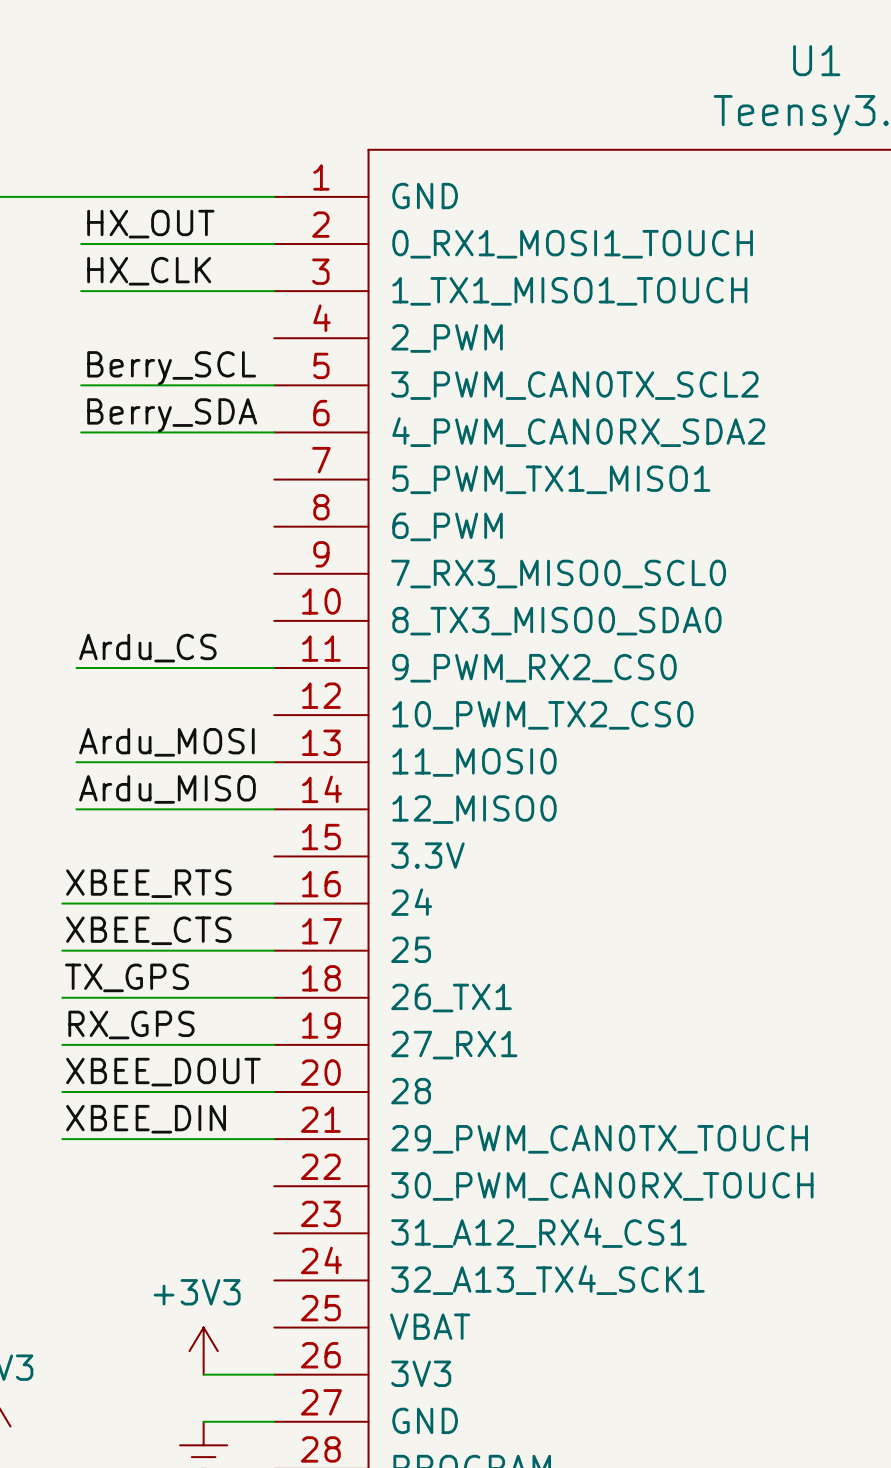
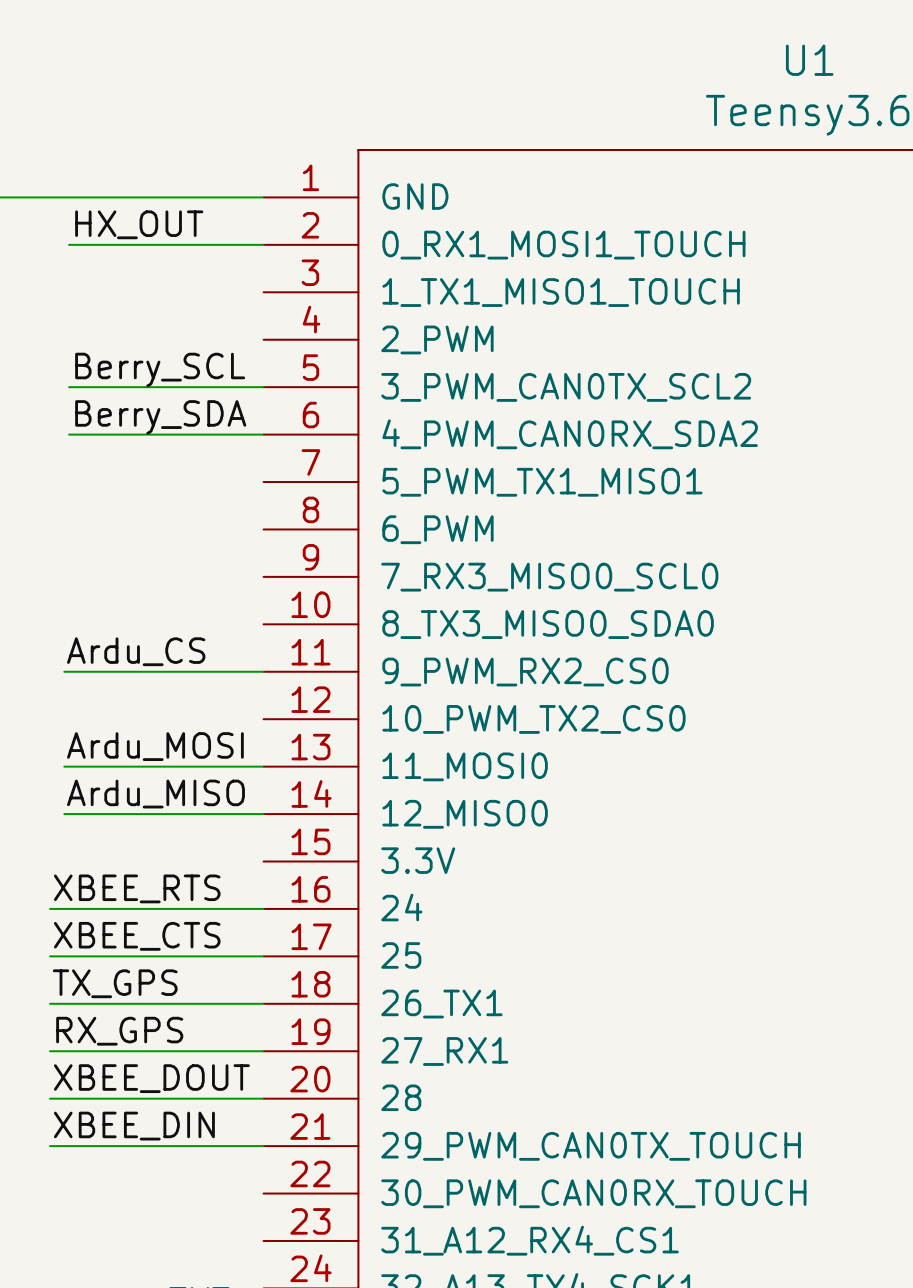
label: HX_CLK (149, 271) -> none
wire: (81, 291) (274, 291) -> none

